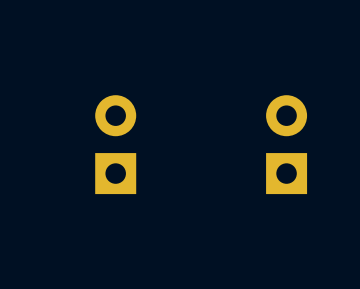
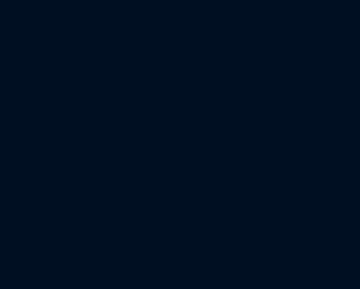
part: (115, 144) -> none
part: (286, 144) -> none

